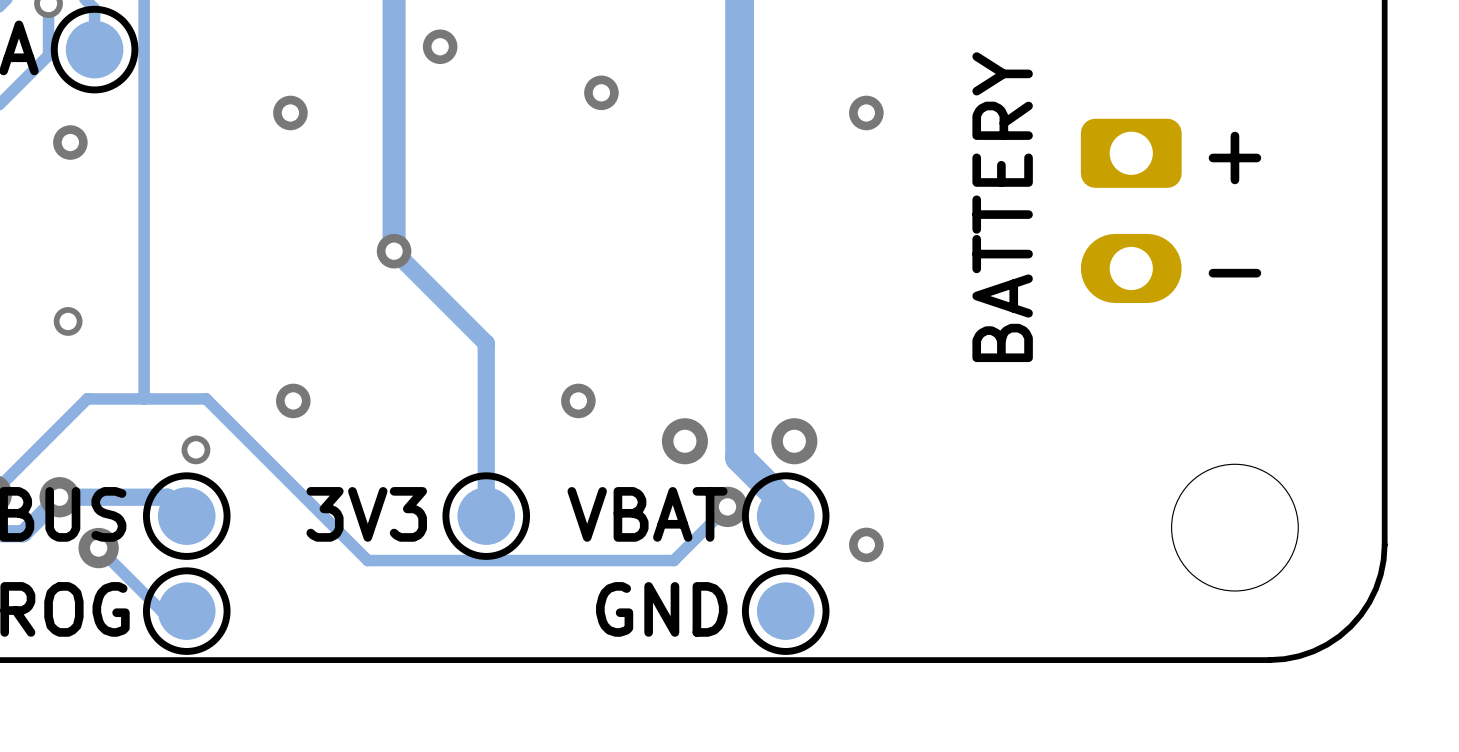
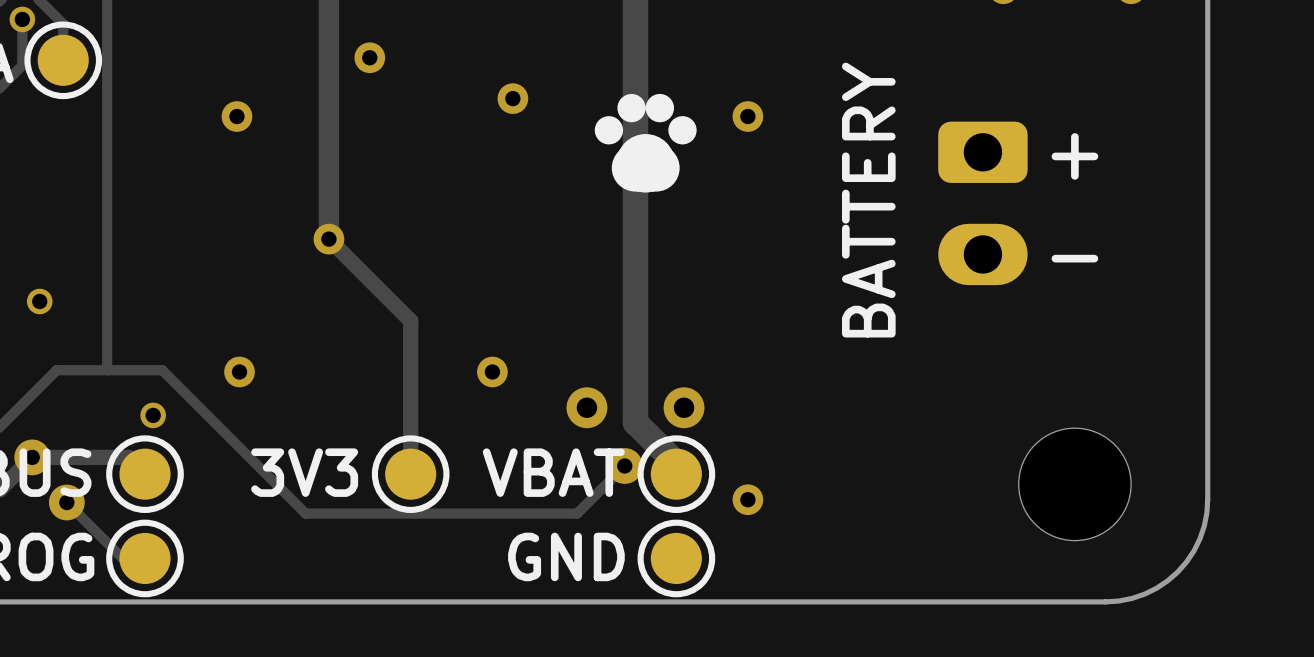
drawing: none -> [594, 93, 697, 193]
via: (70, 142) -> none

